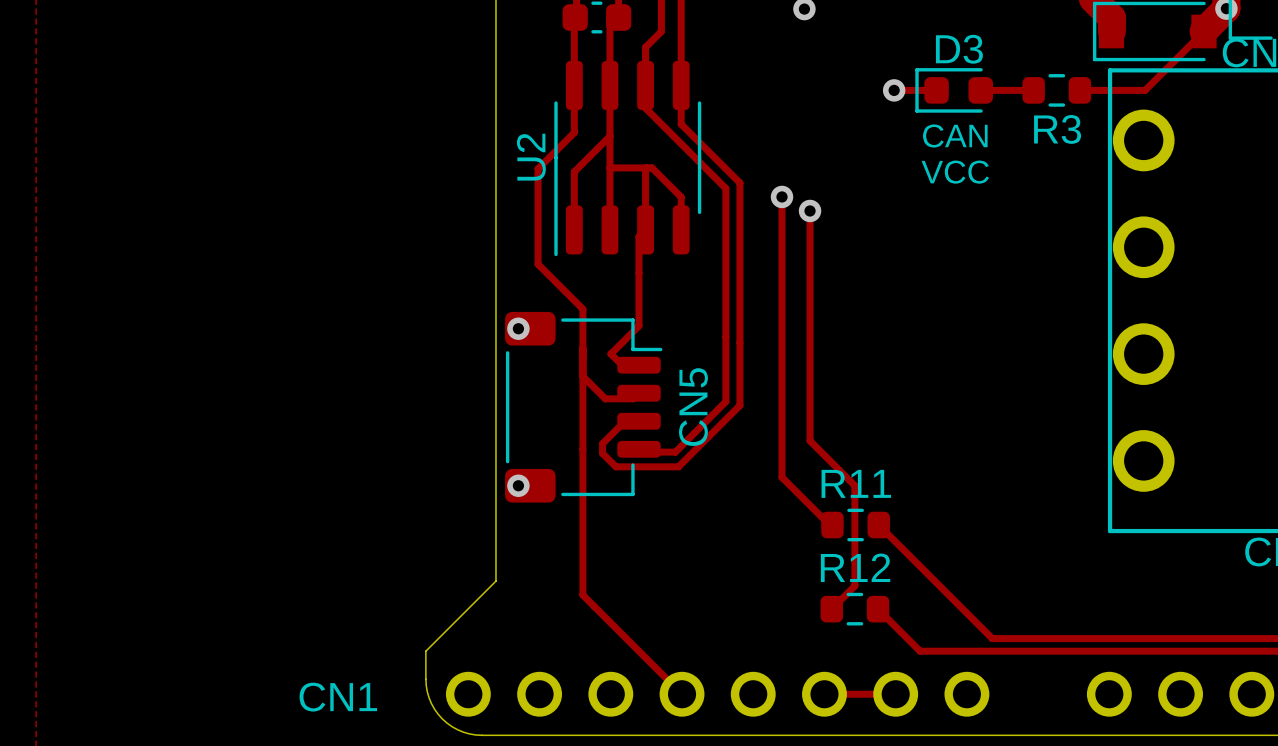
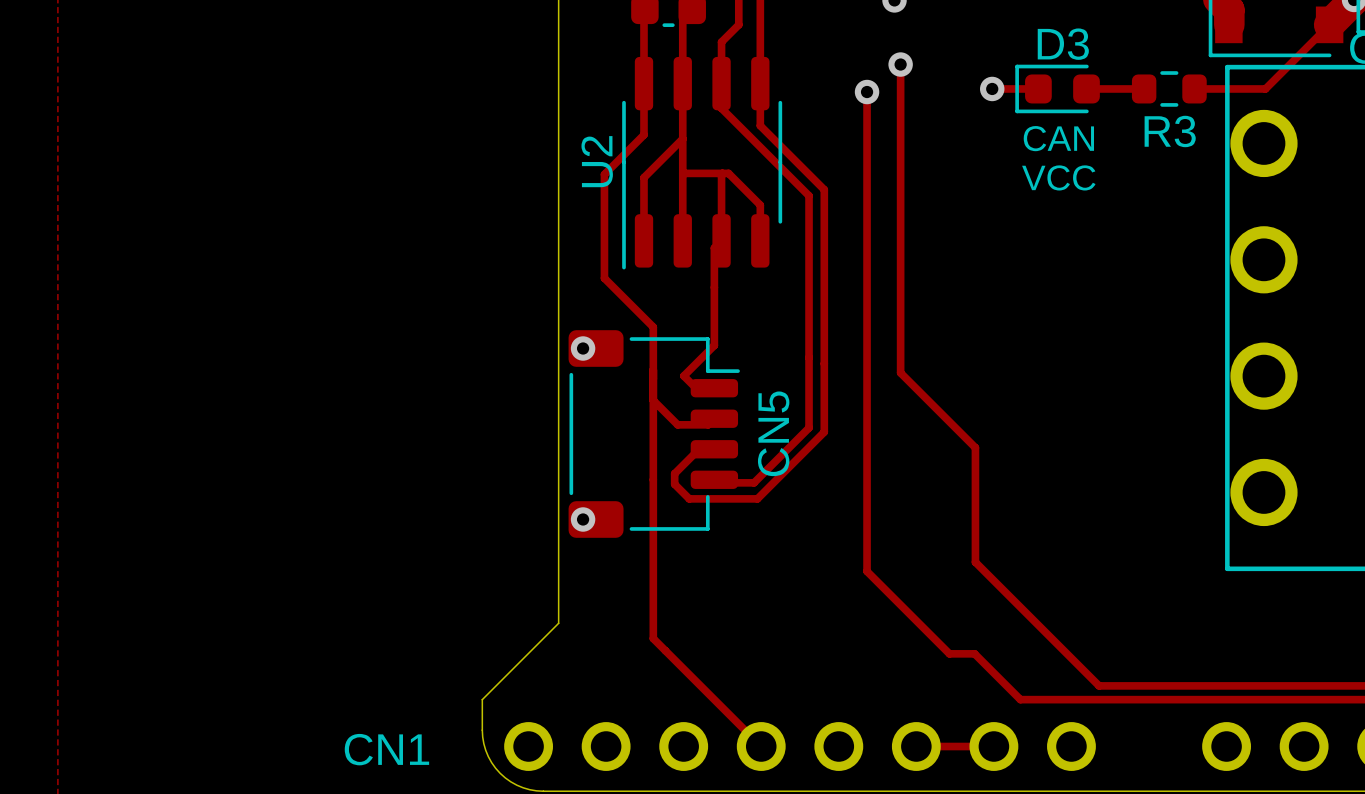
track: none -> (900, 64) (900, 220)
via: none -> (900, 64)
track: none -> (867, 92) (867, 571) (949, 653) (974, 653)
via: none -> (867, 92)
track: (781, 196) (781, 477) (829, 525) (832, 525) -> none
via: (781, 196) -> none
via: (810, 210) -> none
track: (810, 351) (810, 440) (854, 485) (854, 586) (831, 609) -> (900, 372) (975, 447) (975, 562)
R11: (855, 525) -> none
R12: (854, 609) -> none

